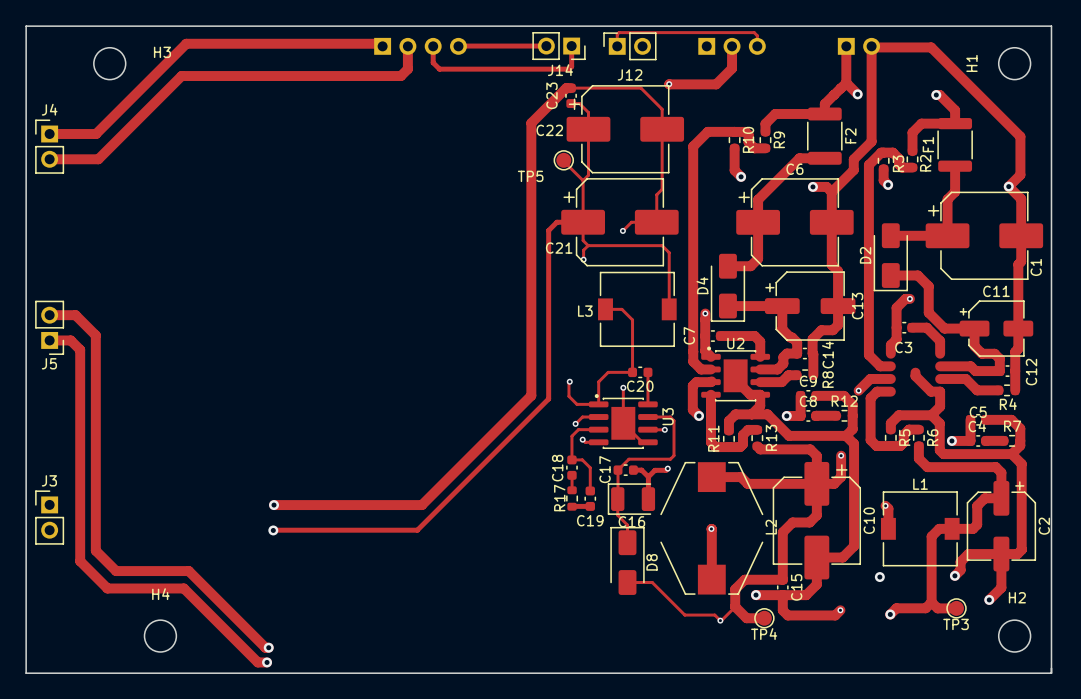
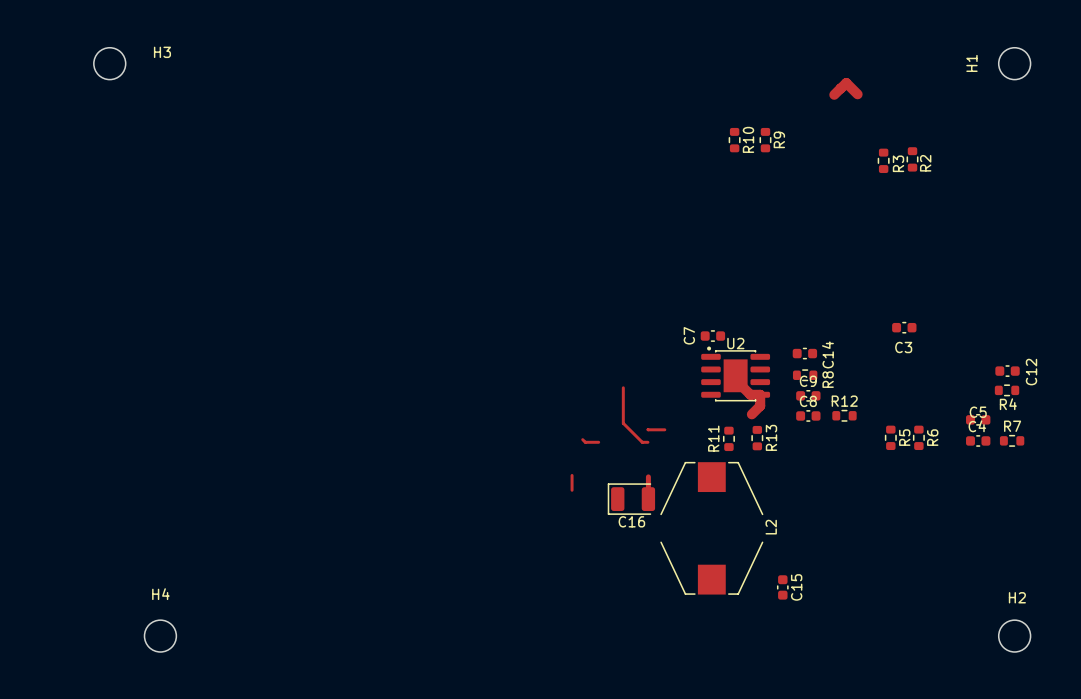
board edge: (26, 26) (26, 673) (1051, 673) (1051, 26) (26, 26) -> none
track: (382, 43) (186, 43) (96, 134) (49, 134) -> none
track: (407, 43) (407, 69) (400, 76) (181, 76) (98, 159) (49, 159) -> none
part: (420, 46) -> none
track: (546, 46) (458, 46) -> none
J14: (559, 46) -> none
track: (571, 46) (571, 66) (569, 69) (439, 69) (433, 62) (433, 46) -> none
track: (617, 46) (617, 34) (619, 32) (754, 32) (757, 35) (757, 46) -> none
J12: (629, 46) -> none
track: (732, 46) (732, 68) (716, 84) (669, 84) -> none
part: (732, 46) -> none
part: (858, 46) -> none
track: (846, 47) (846, 82) -> none
track: (871, 47) (931, 47) (1020, 136) (1020, 174) (1008, 186) (1021, 199) (1021, 261) (1018, 264) (1018, 348) (1015, 351) (1015, 390) -> none
track: (871, 47) (871, 141) (853, 159) (853, 170) (831, 192) -> none
via: (669, 84) -> none
track: (834, 94) (824, 104) (824, 113) (775, 113) (765, 123) (765, 131) -> none
via: (857, 94) -> none
C23: (571, 95) -> none
track: (936, 95) (939, 95) (955, 110) (955, 123) (921, 123) (912, 132) (912, 151) -> none
via: (936, 95) -> none
track: (571, 103) (579, 103) (588, 112) (588, 175) (583, 180) -> none
C22: (625, 129) -> none
track: (734, 131) (707, 131) (693, 146) (693, 351) -> none
track: (734, 131) (745, 131) (748, 134) (748, 142) (754, 148) (765, 148) -> none
F2: (824, 136) -> none
F1: (955, 144) -> none
J4: (49, 146) -> none
track: (734, 148) (734, 170) (741, 176) -> none
track: (824, 158) (799, 158) (758, 199) (758, 258) (750, 266) (727, 266) -> none
track: (563, 160) (583, 180) -> none
TP5: (563, 160) -> none
track: (955, 166) (955, 191) (947, 199) (947, 235) (890, 235) -> none
track: (912, 167) (902, 167) (899, 164) (899, 159) (892, 152) (881, 152) (868, 165) (868, 354) (880, 366) (890, 366) -> none
track: (883, 169) (883, 180) (888, 184) -> none
via: (741, 176) -> none
track: (583, 180) (583, 240) (588, 245) -> none
via: (888, 184) -> none
track: (812, 186) (826, 186) (831, 192) -> none
via: (812, 186) -> none
via: (1008, 186) -> none
track: (831, 192) (831, 264) (838, 271) (838, 324) (832, 330) (821, 330) (812, 339) (813, 375) -> none
track: (583, 222) (556, 222) (548, 230) (548, 398) (417, 530) (273, 530) -> none
C21: (619, 222) -> none
C6: (794, 222) -> none
track: (622, 230) (631, 222) (656, 222) (656, 194) (662, 189) (662, 109) (640, 88) (566, 88) (531, 123) (531, 395) (421, 505) (274, 505) -> none
via: (622, 230) -> none
C1: (984, 235) -> none
track: (588, 245) (583, 250) (583, 259) -> none
track: (588, 245) (662, 245) (669, 252) (669, 309) -> none
D2: (890, 257) -> none
via: (583, 259) -> none
track: (890, 275) (917, 275) (928, 286) (928, 312) (944, 328) (974, 328) (974, 346) (982, 353) (994, 353) (999, 358) (999, 371) (975, 371) (970, 366) (940, 366) -> none
D4: (727, 287) -> none
track: (909, 298) (905, 298) (896, 307) (896, 339) (890, 345) (890, 353) -> none
via: (909, 298) -> none
track: (727, 306) (782, 306) -> none
track: (782, 306) (782, 329) (797, 342) (797, 353) (786, 353) (783, 357) (783, 363) (777, 369) (760, 369) -> none
C13: (810, 306) -> none
track: (605, 309) (621, 309) (632, 319) (632, 372) (608, 372) (598, 381) (598, 404) (576, 404) (568, 396) (569, 381) -> none
L3: (637, 309) -> none
track: (705, 313) (705, 351) (710, 356) -> none
via: (705, 313) -> none
track: (49, 315) (75, 315) (95, 335) (95, 550) (116, 571) (188, 571) (265, 647) (268, 647) -> none
J5: (49, 327) -> none
track: (912, 327) (926, 327) (940, 341) (940, 353) -> none
C11: (996, 328) -> none
track: (720, 336) (754, 336) (760, 341) (760, 356) -> none
track: (49, 340) (70, 340) (80, 349) (80, 561) (107, 588) (183, 588) (257, 662) (267, 662) -> none
track: (693, 351) (693, 361) (701, 369) (710, 369) -> none
C20: (640, 372) -> none
track: (647, 372) (647, 404) -> none
track: (915, 372) (915, 376) (931, 391) (940, 391) (940, 406) (931, 415) -> none
track: (796, 375) (788, 375) (781, 382) (760, 382) -> none
track: (890, 378) (870, 378) (858, 390) -> none
track: (940, 378) (965, 378) (977, 390) (998, 390) -> none
via: (569, 381) -> none
track: (711, 381) (696, 382) (692, 385) (692, 409) (699, 415) -> none
via: (623, 387) -> none
via: (858, 390) -> none
track: (890, 391) (877, 391) (870, 398) (870, 440) (876, 446) (900, 446) (903, 442) (903, 434) (909, 429) (918, 429) -> none
track: (710, 394) (710, 442) (715, 447) (740, 447) (742, 444) (742, 435) (748, 429) (757, 429) -> none
track: (800, 395) (800, 415) (786, 415) -> none
track: (816, 395) (843, 395) (852, 404) (852, 429) (846, 435) -> none
via: (699, 415) -> none
via: (786, 415) -> none
track: (836, 415) (816, 415) -> none
track: (931, 415) (939, 423) (939, 450) (943, 454) (1011, 454) -> none
track: (931, 415) (898, 415) (890, 423) (890, 429) -> none
track: (598, 417) (582, 417) (575, 423) -> none
track: (647, 417) (670, 417) (673, 420) (673, 455) (670, 459) (628, 459) (618, 470) (617, 515) (627, 525) (627, 542) -> none
track: (970, 419) (970, 440) (951, 440) -> none
track: (985, 419) (1011, 419) (1020, 428) (1020, 445) (1011, 454) -> none
U3: (623, 421) -> none
via: (575, 423) -> none
track: (598, 429) (578, 429) (571, 436) (571, 459) (582, 459) (590, 467) (590, 490) -> none
via: (664, 429) -> none
track: (728, 430) (728, 421) (735, 414) (767, 414) (789, 435) (846, 435) -> none
track: (846, 435) (854, 443) (854, 546) (842, 557) (816, 557) (816, 584) (806, 595) (756, 595) -> none
via: (582, 439) -> none
via: (951, 440) -> none
track: (986, 440) (1003, 440) -> none
track: (757, 446) (760, 449) (810, 449) (816, 455) (816, 515) (809, 522) (792, 522) (782, 532) (782, 579) (744, 579) (735, 589) (735, 606) (721, 620) (714, 615) (684, 615) (652, 582) (627, 582) -> none
track: (918, 446) (918, 458) (927, 467) (995, 467) (1001, 472) (1001, 498) (984, 498) (977, 505) (977, 524) (973, 528) (939, 528) (931, 536) (931, 602) -> none
track: (1011, 454) (1021, 464) (1021, 549) (1017, 554) (968, 554) (960, 561) (960, 570) (954, 575) -> none
track: (841, 455) (841, 476) (834, 483) (747, 483) (740, 477) (711, 477) -> none
via: (841, 455) -> none
C18: (571, 467) -> none
track: (667, 468) (654, 470) (648, 476) (641, 470) (633, 470) -> none
via: (667, 468) -> none
C17: (625, 470) -> none
R17: (572, 498) -> none
C19: (590, 498) -> none
via: (274, 505) -> none
track: (885, 505) (888, 508) (888, 528) -> none
via: (885, 505) -> none
track: (590, 506) (572, 506) -> none
J3: (49, 517) -> none
C10: (816, 520) -> none
C2: (1001, 526) -> none
track: (711, 528) (711, 579) -> none
via: (711, 528) -> none
L1: (920, 528) -> none
via: (273, 530) -> none
track: (1001, 554) (1001, 587) (989, 599) -> none
D8: (627, 561) -> none
via: (954, 575) -> none
via: (879, 577) -> none
via: (756, 595) -> none
track: (782, 595) (782, 610) (787, 615) (835, 615) (840, 610) -> none
via: (989, 599) -> none
track: (931, 602) (925, 608) (896, 608) (890, 614) -> none
track: (931, 602) (937, 608) (956, 608) -> none
track: (735, 606) (746, 618) (764, 618) -> none
TP3: (956, 608) -> none
via: (840, 610) -> none
via: (890, 614) -> none
TP4: (764, 618) -> none
via: (720, 620) -> none
via: (268, 647) -> none
via: (267, 662) -> none

